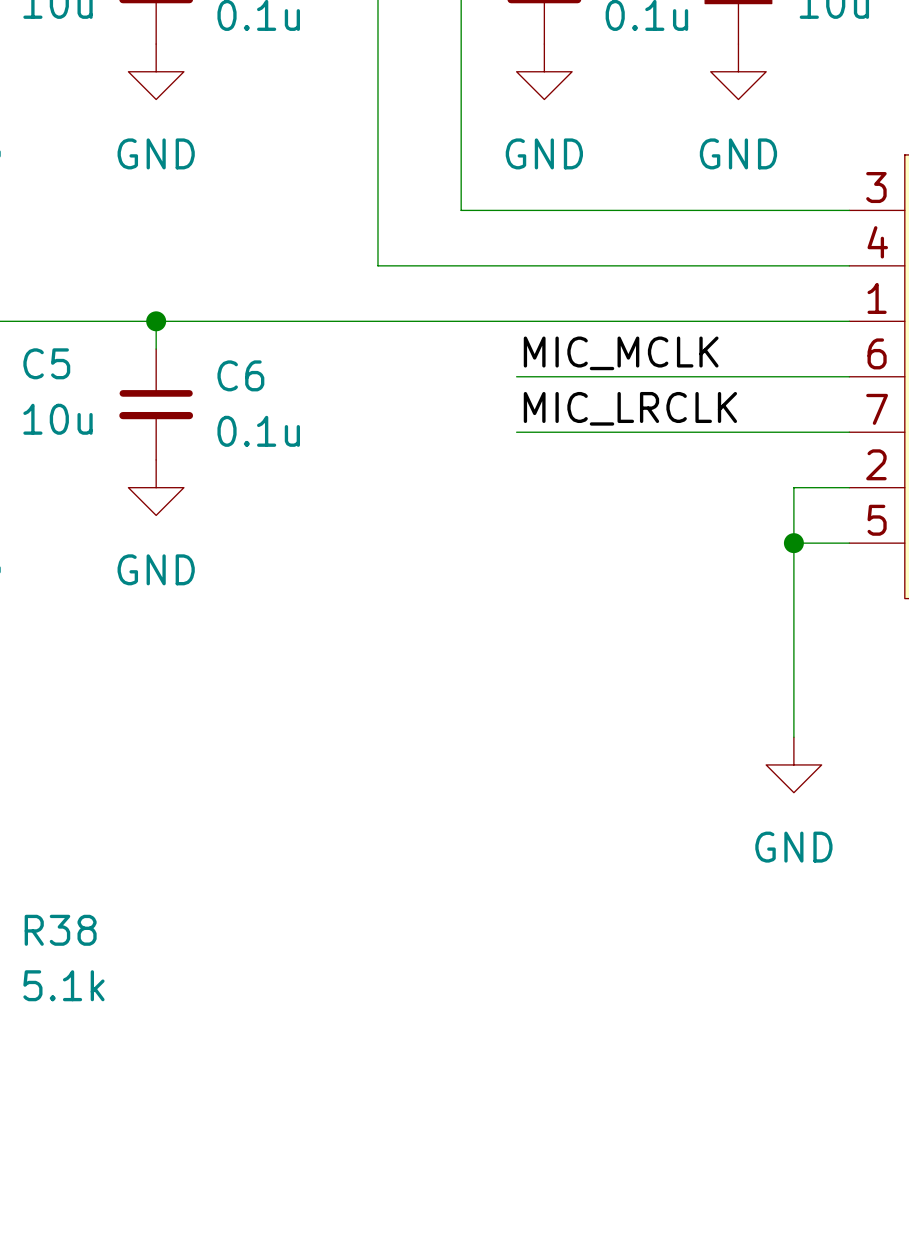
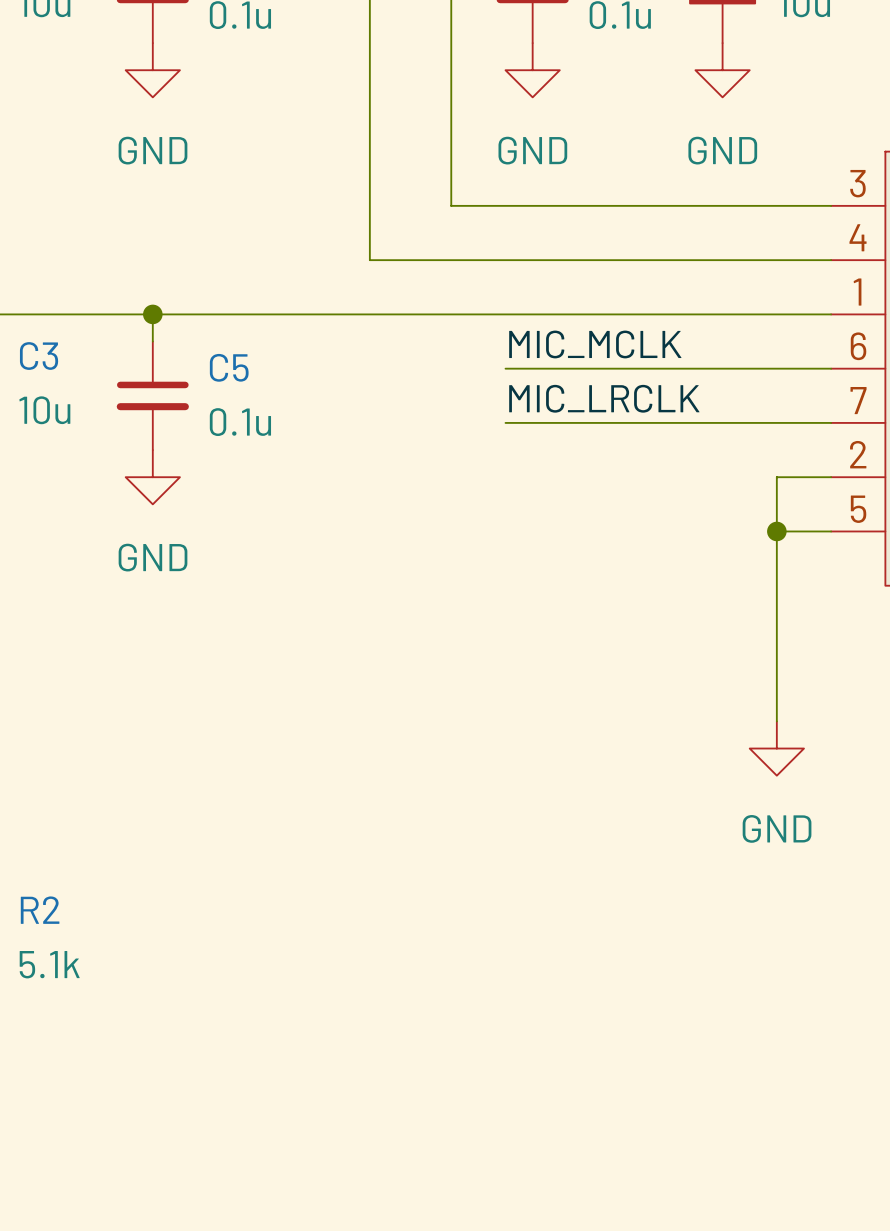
C5 name: C5 (46, 363) -> C3 (39, 356)
C6 name: C6 (240, 375) -> C5 (229, 367)
R38 name: R38 (60, 930) -> R2 (40, 910)

